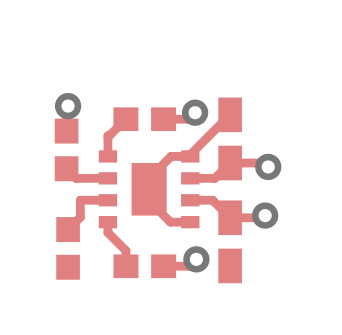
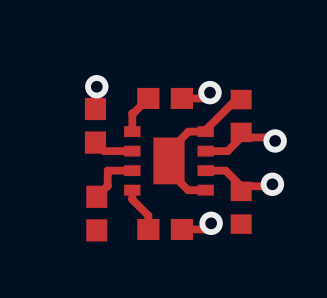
part footprint: [218, 97, 242, 181] -> [230, 89, 252, 143]
part footprint: [218, 200, 242, 284] -> [230, 181, 252, 234]

